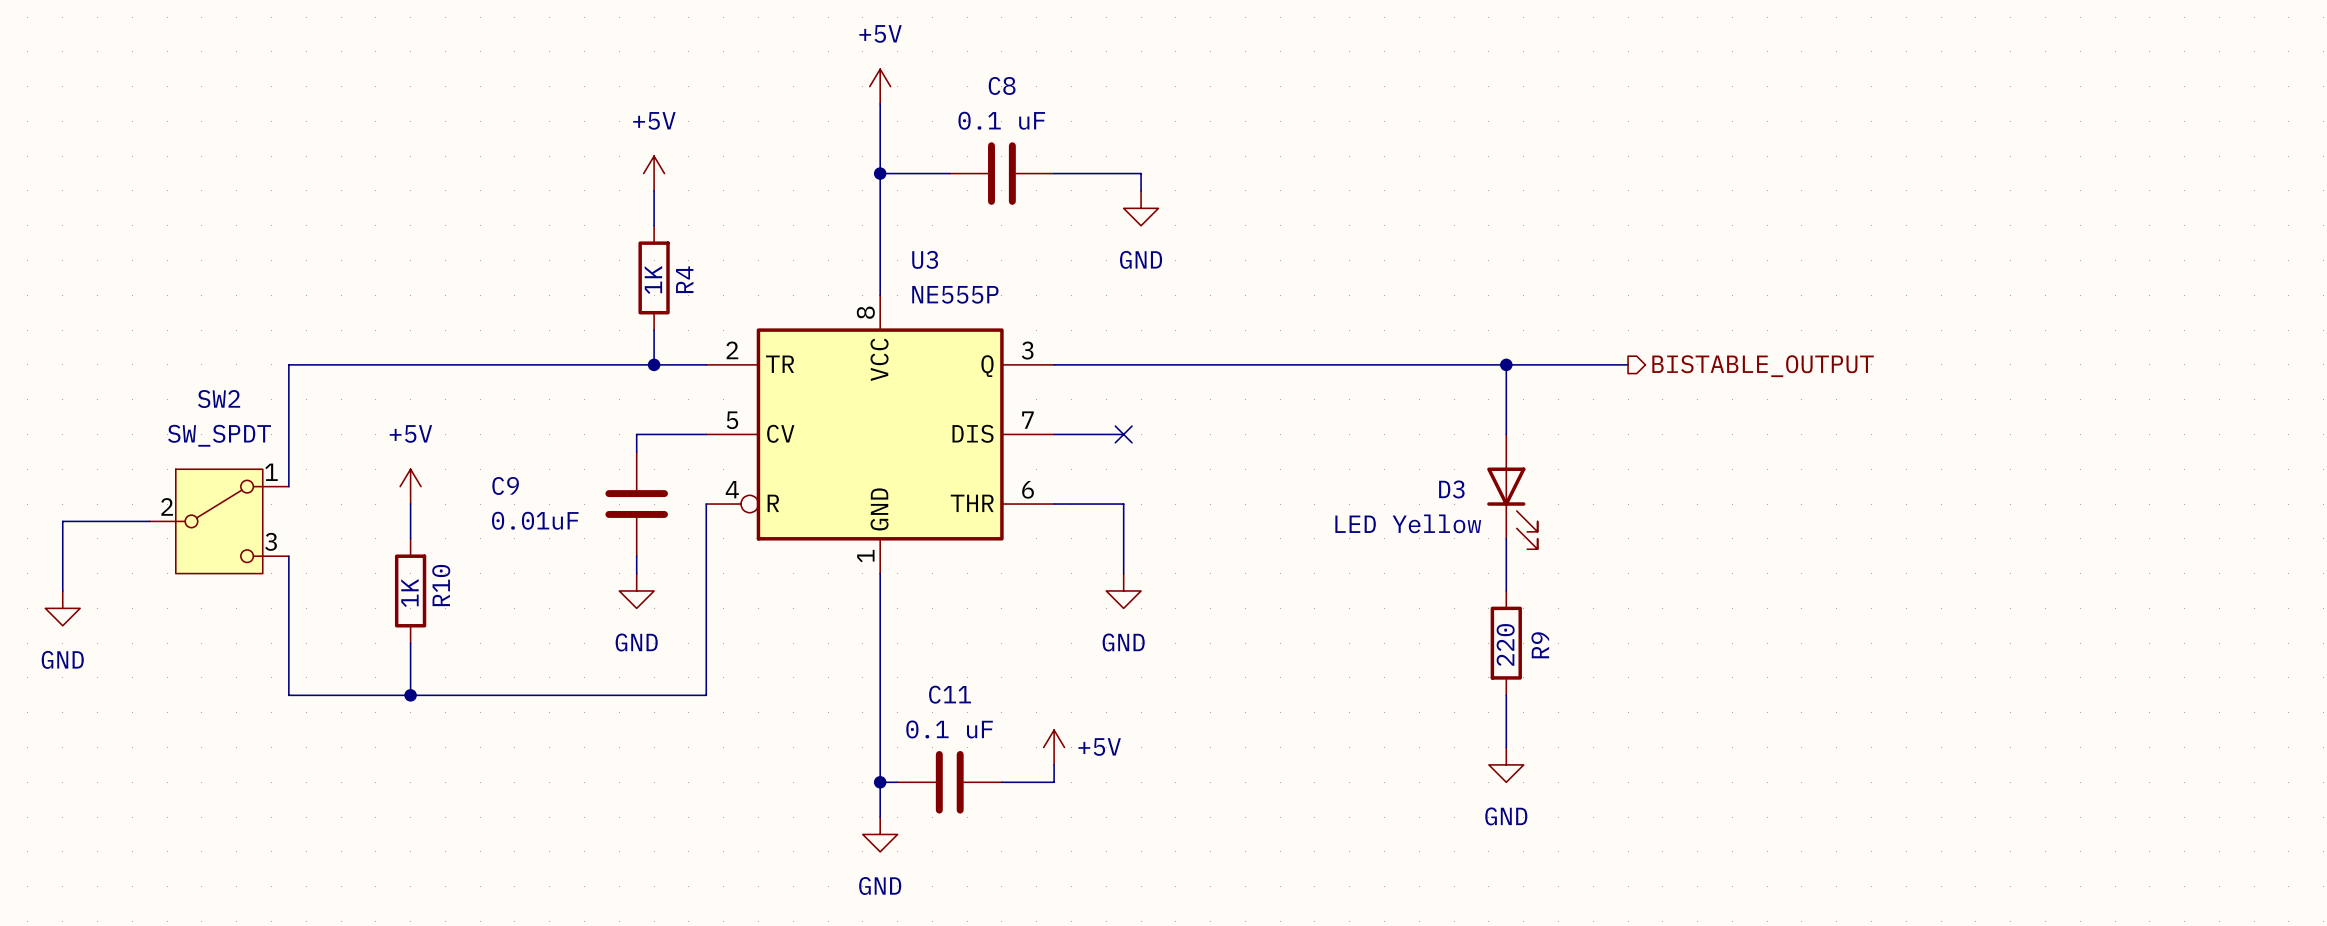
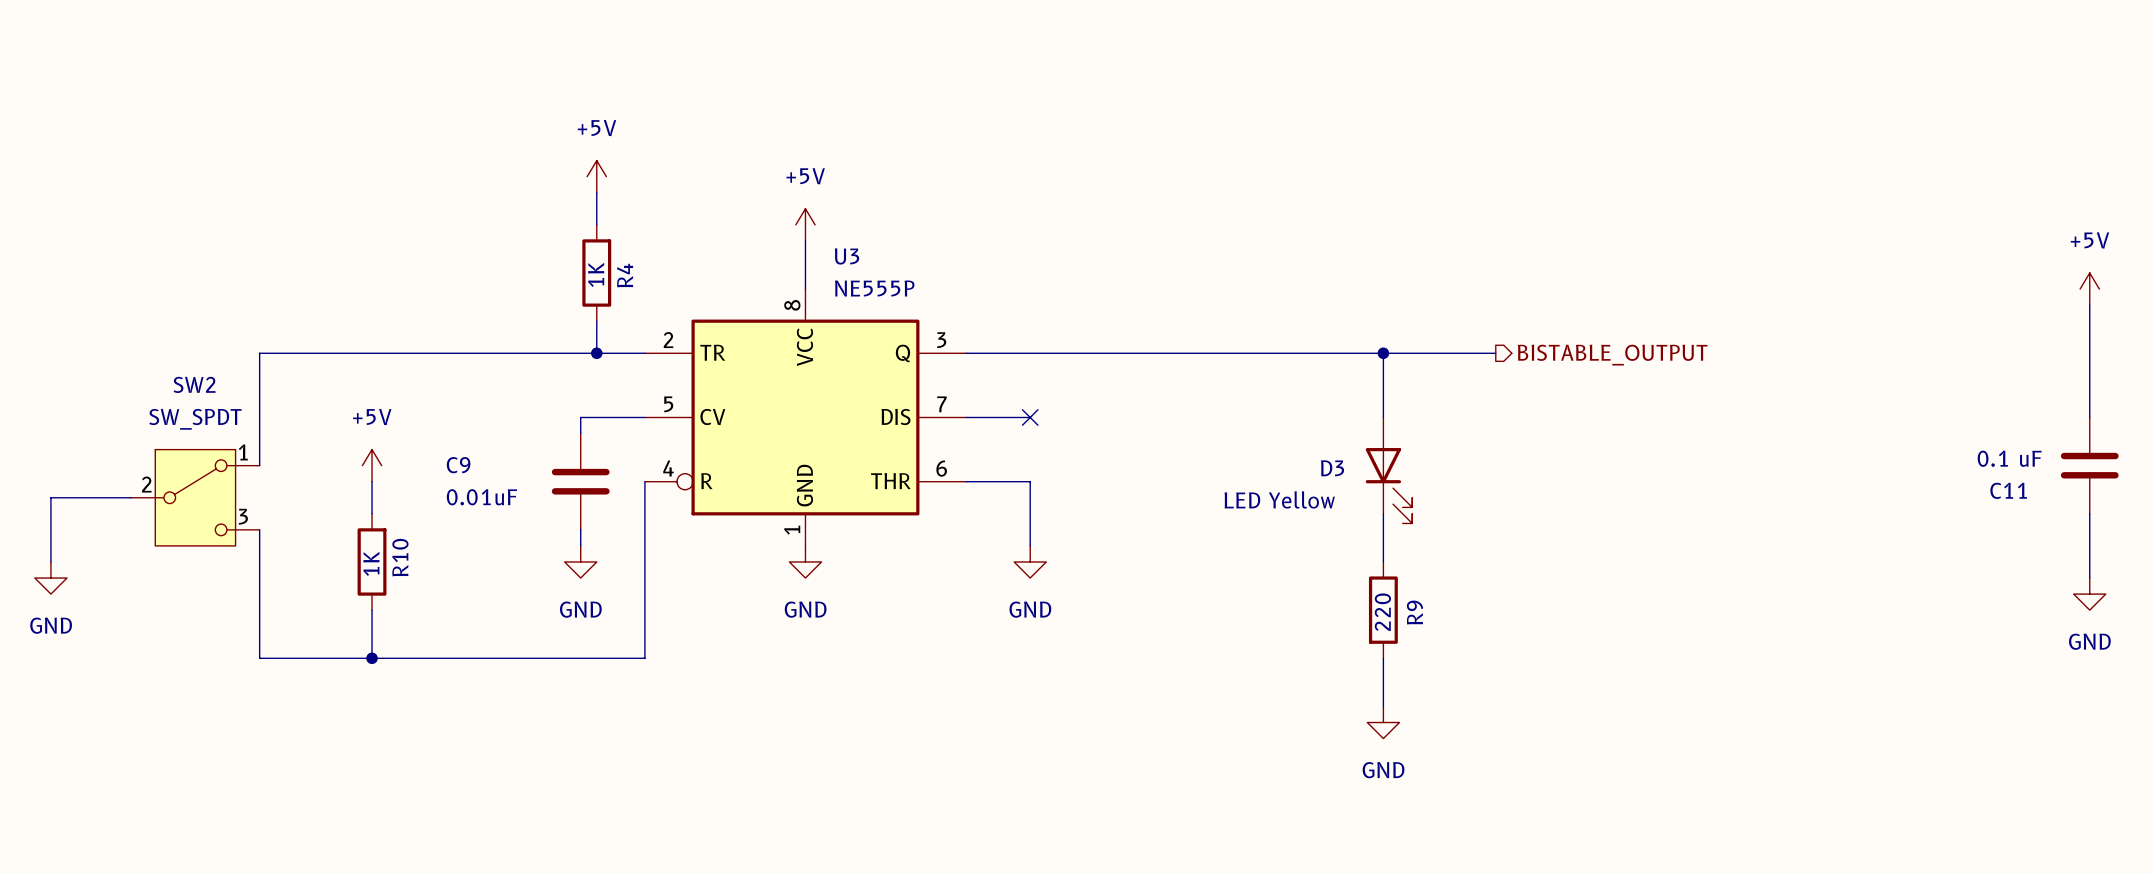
power symbol position: +5V (880, 86) -> +5V (805, 224)
wire: (880, 104) (880, 243) -> none
wire: (880, 173) (949, 173) -> none
junction: (880, 173) -> none
C8: 0.1 uF (1001, 173) -> none
wire: (1054, 173) (1141, 173) (1141, 190) -> none
power symbol: GND (1141, 208) -> none
power symbol: none -> +5V (2089, 289)
wire: none -> (2089, 305) (2089, 417)
wire: none -> (2089, 513) (2089, 578)
wire: (880, 573) (880, 817) -> none
power symbol: none -> GND (805, 561)
power symbol: none -> GND (2089, 594)
C11 name position: C11 (950, 694) -> C11 (2008, 490)
C11 value position: 0.1 uF (949, 729) -> 0.1 uF (2009, 458)
power symbol: +5V (1054, 747) -> none
wire: (1054, 764) (1054, 782) (1001, 782) -> none
wire: (880, 782) (897, 782) -> none
junction: (880, 782) -> none
C11 rotation: 0° (949, 782) -> 90° clockwise (2089, 465)
C11 position: (949, 782) -> (2089, 465)
power symbol: GND (880, 834) -> none

